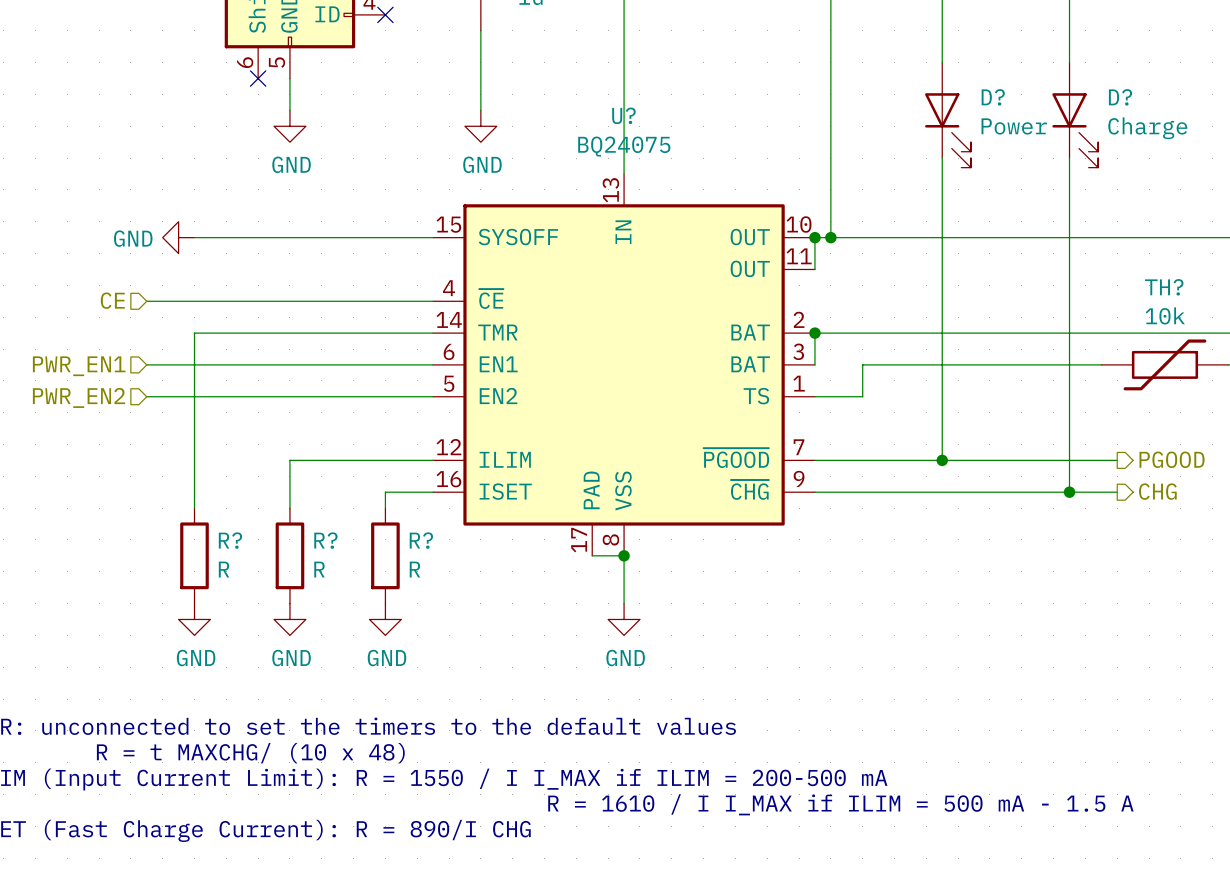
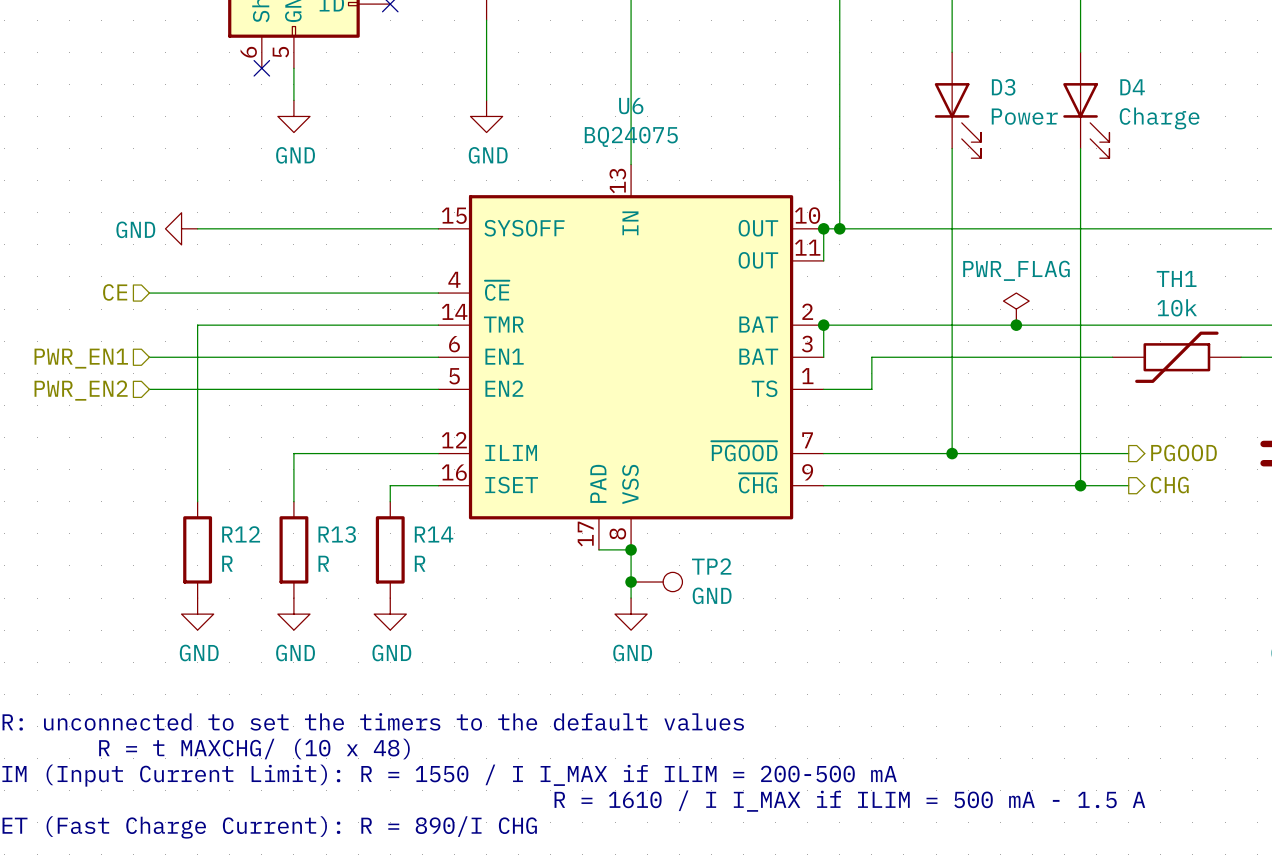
D? name: D? (993, 97) -> D3 (1003, 87)
D? name: D? (1120, 97) -> D4 (1132, 87)
U? name: U? (623, 115) -> U6 (631, 106)
TH? name: TH? (1164, 287) -> TH1 (1176, 278)
power symbol: none -> PWR_FLAG (1016, 309)
junction: none -> (1016, 325)
R? name: R? (230, 540) -> R12 (241, 534)
R? name: R? (325, 540) -> R13 (337, 534)
R? name: R? (421, 540) -> R14 (434, 534)
junction: none -> (631, 582)
TP2: none -> GND (656, 582)

